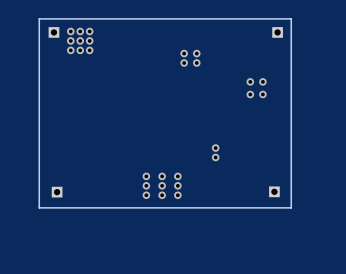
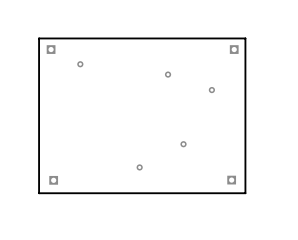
via: (70, 31) -> none
via: (80, 31) -> none
via: (89, 31) -> none
via: (70, 40) -> none
via: (80, 40) -> none
via: (89, 40) -> none
via: (70, 50) -> none
via: (80, 50) -> none
via: (184, 53) -> none
via: (196, 53) -> none
via: (184, 62) -> none
via: (262, 81) -> none
via: (250, 94) -> none
via: (262, 94) -> none
via: (215, 157) -> none
via: (146, 176) -> none
via: (177, 176) -> none
via: (146, 185) -> none
via: (162, 185) -> none
via: (177, 185) -> none
via: (146, 195) -> none
via: (162, 195) -> none
via: (177, 195) -> none

